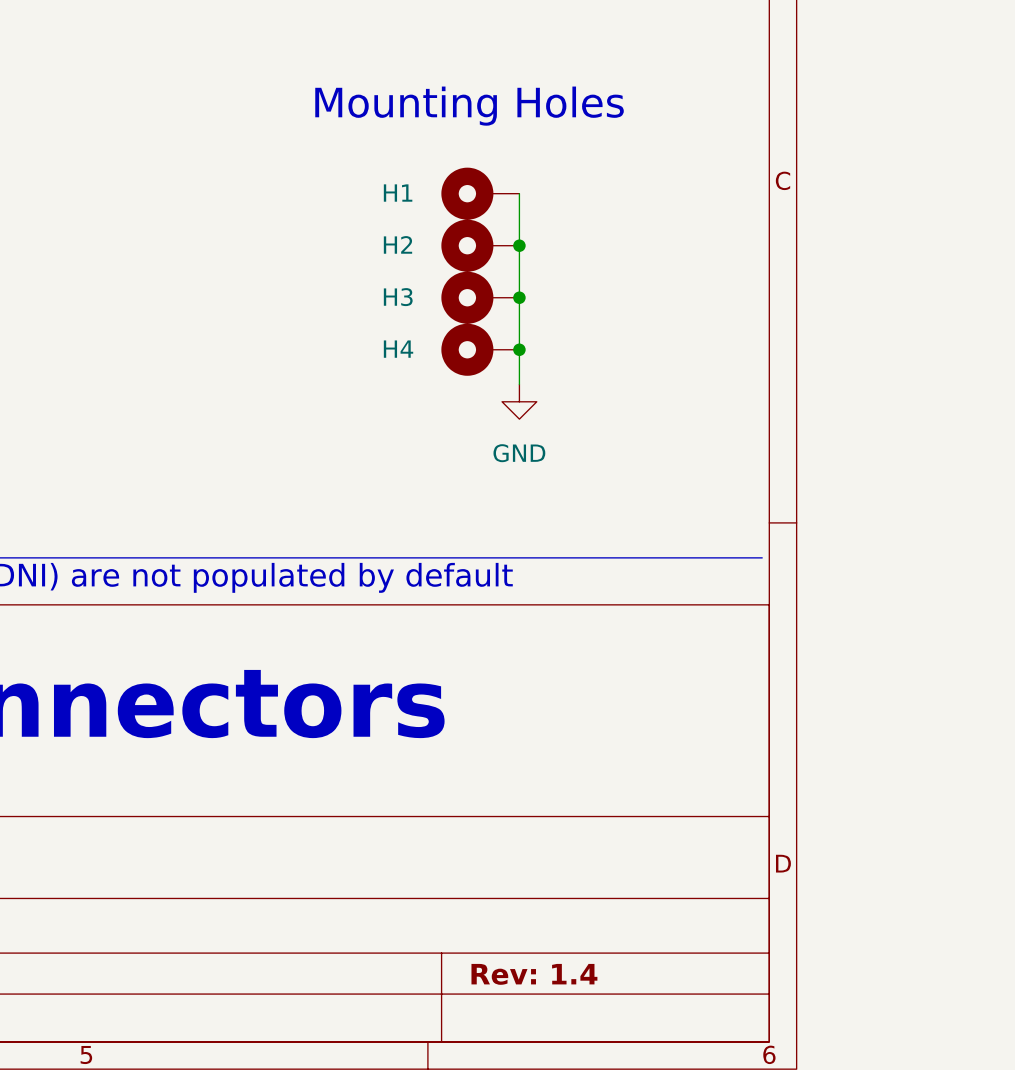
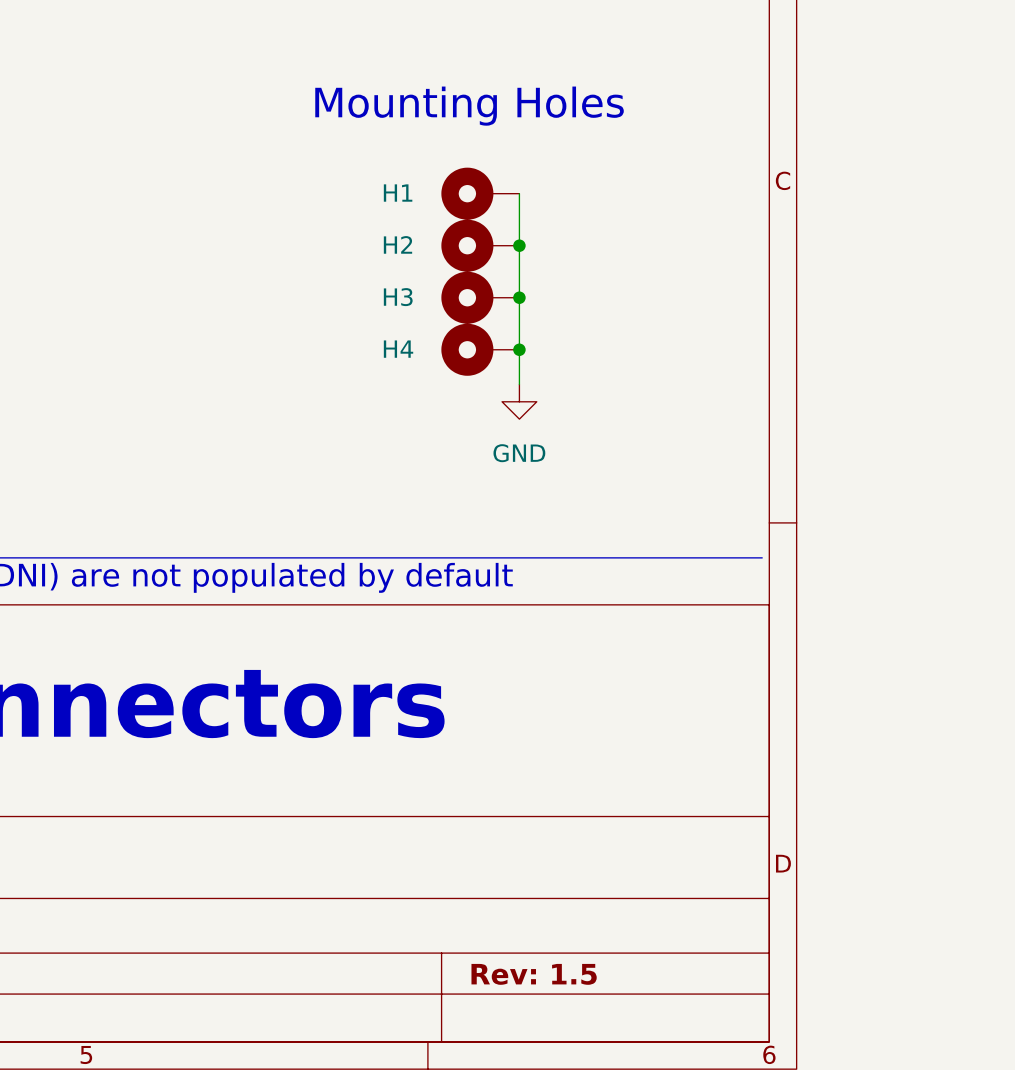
title block: Rev: 1.4 (534, 974) -> Rev: 1.5 (534, 974)

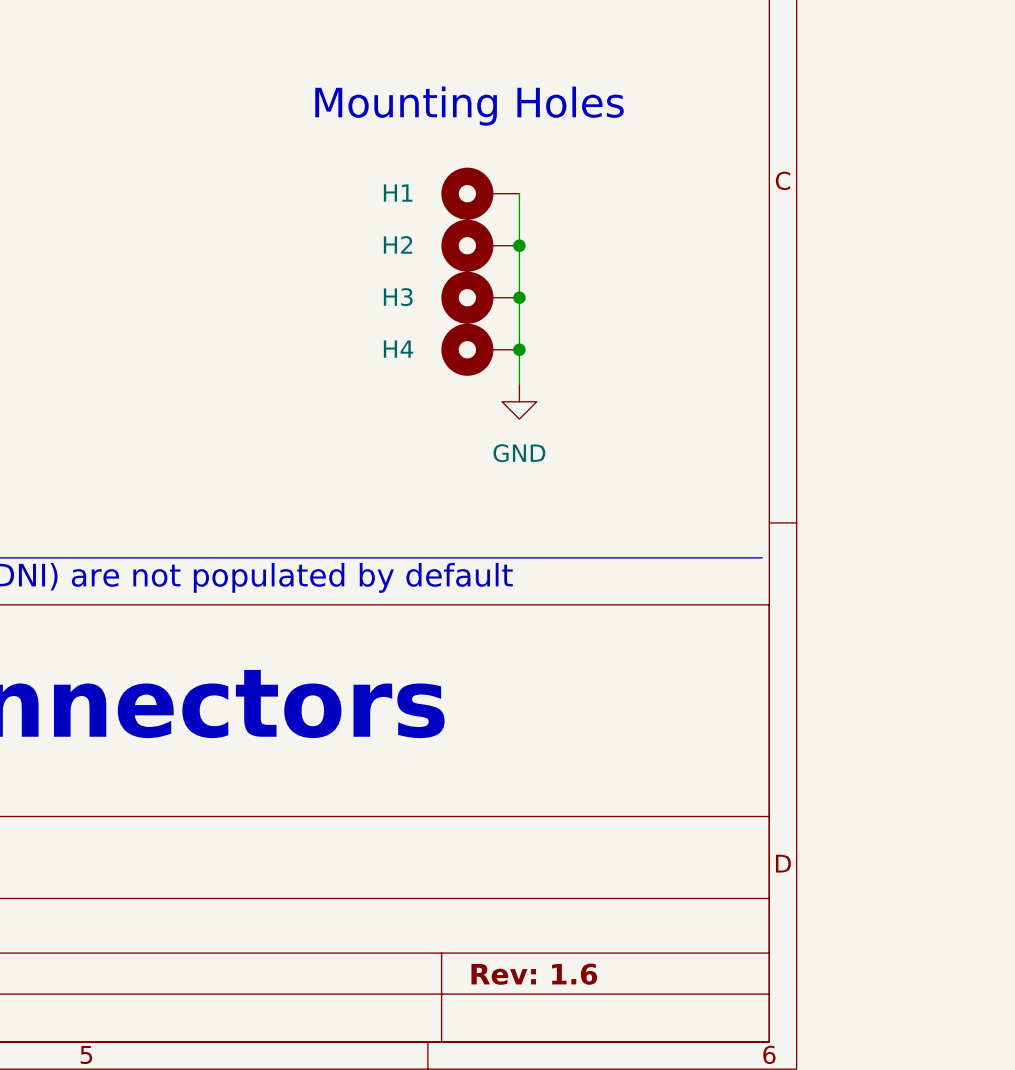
title block: Rev: 1.5 (534, 974) -> Rev: 1.6 (534, 974)

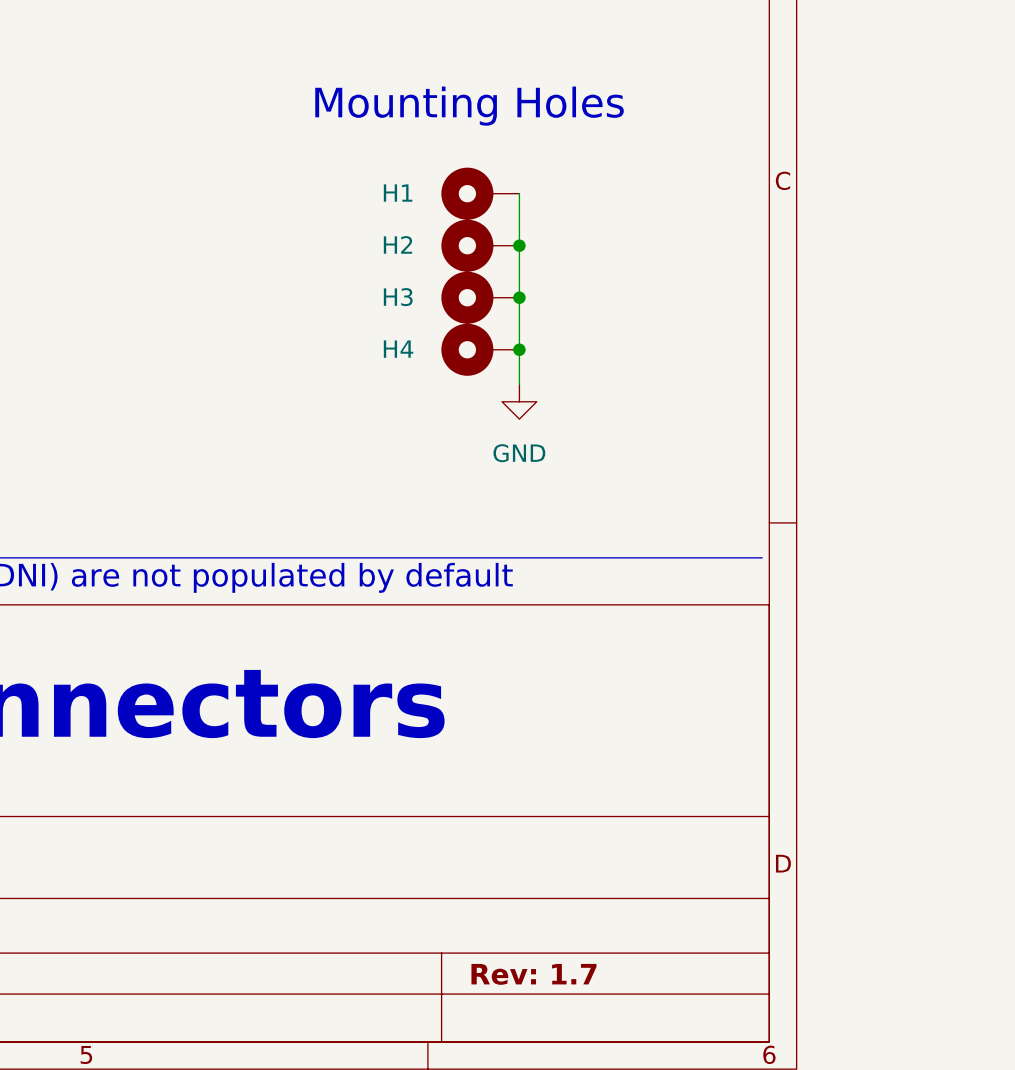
title block: Rev: 1.6 (534, 974) -> Rev: 1.7 (533, 974)

